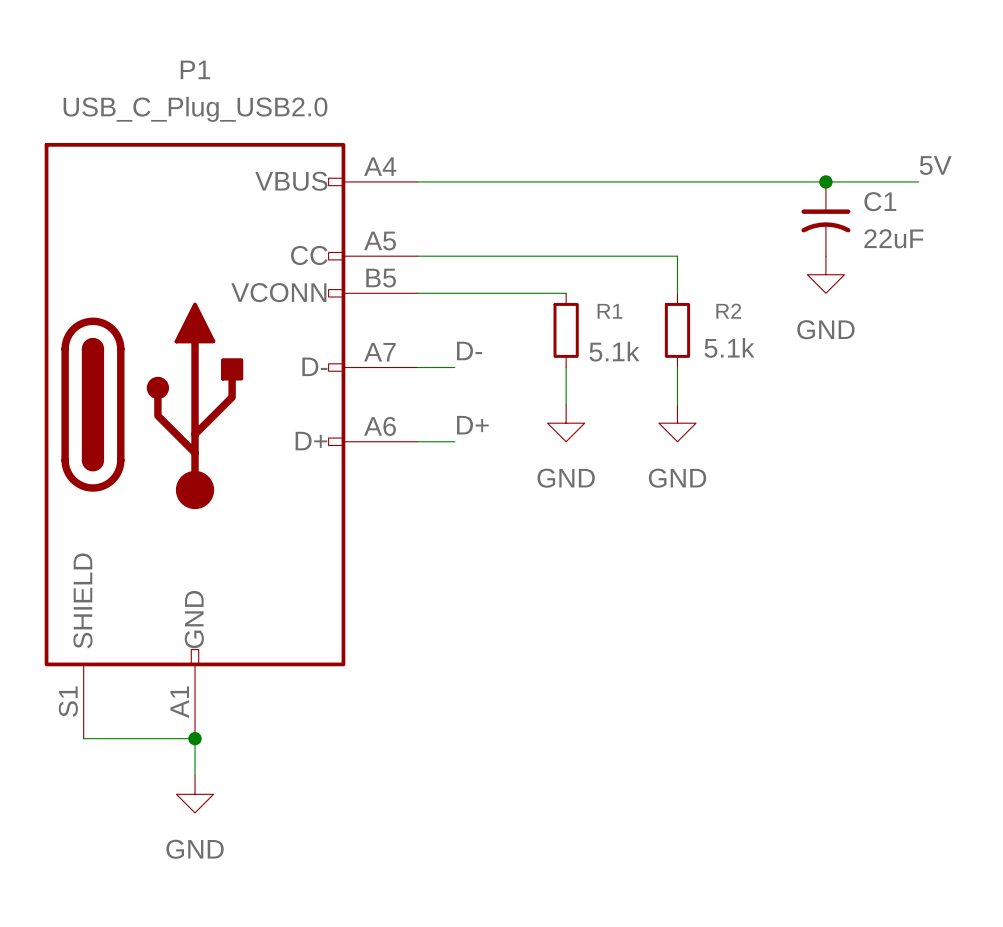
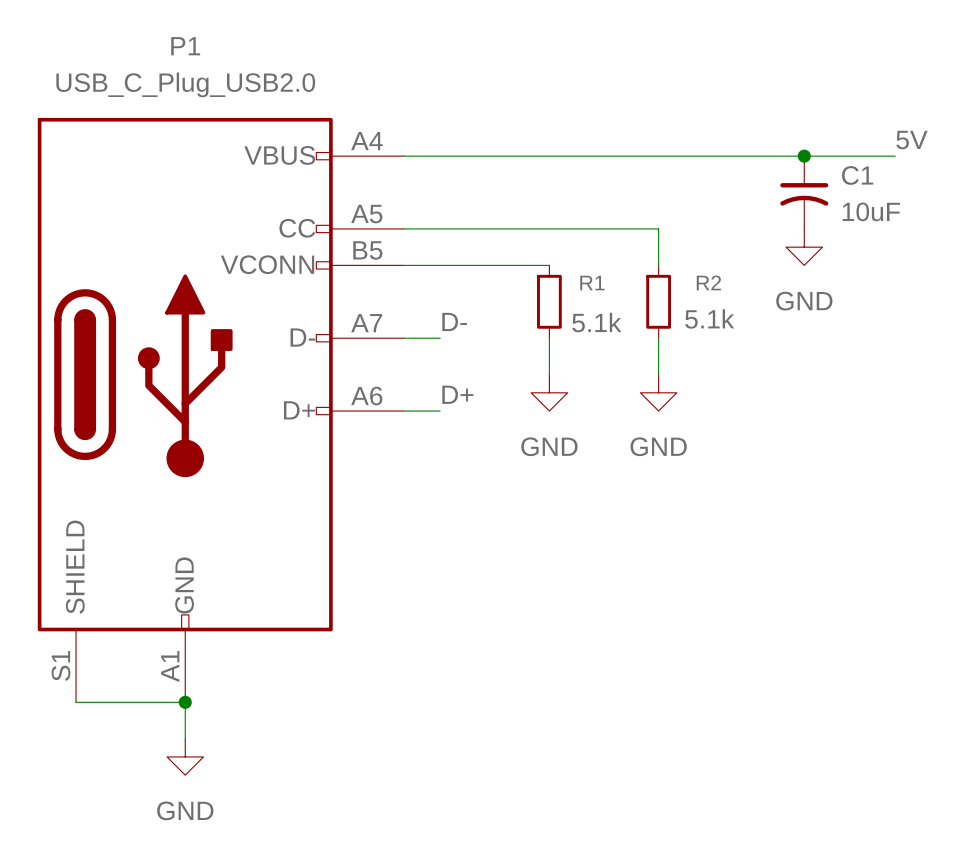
C1 value: 22uF (893, 238) -> 10uF (871, 211)

